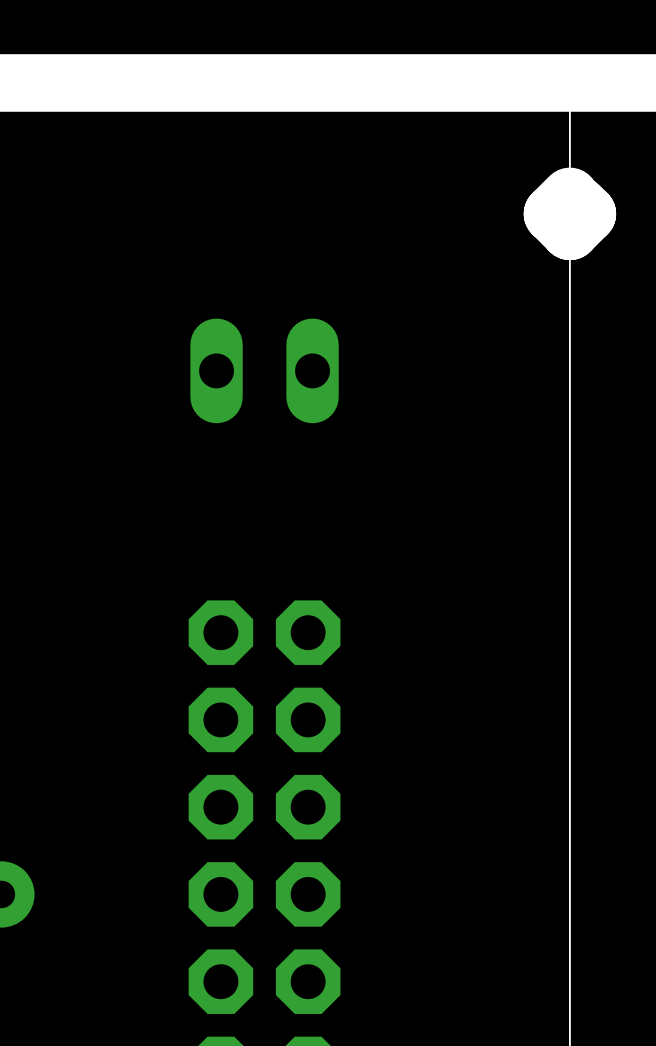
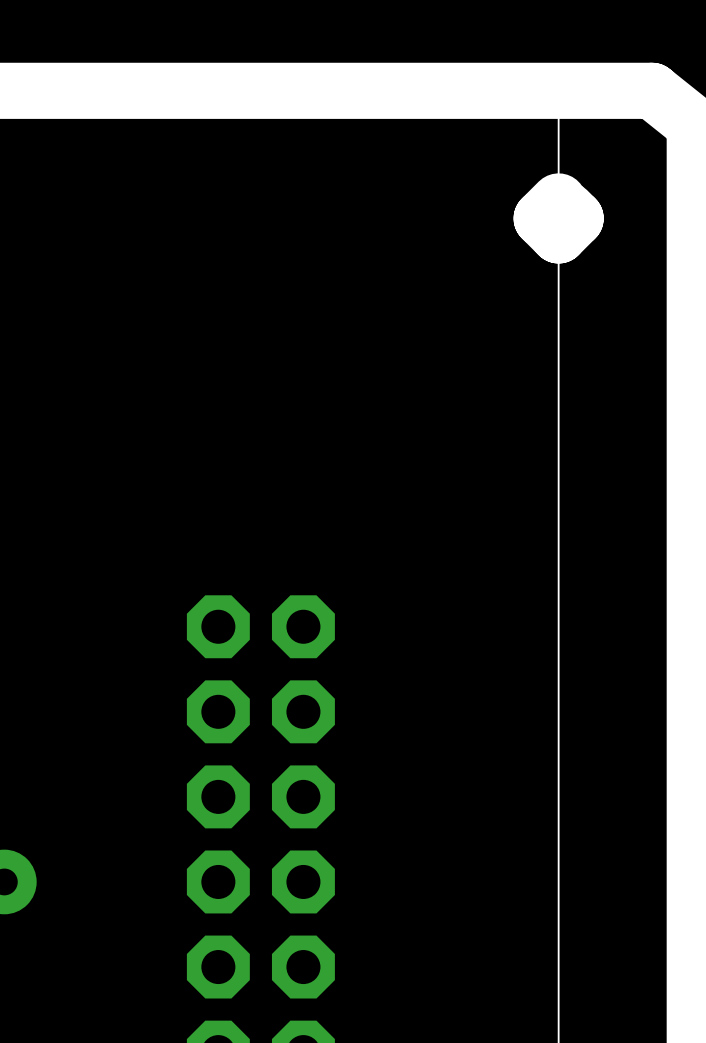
part: (264, 370) -> none

